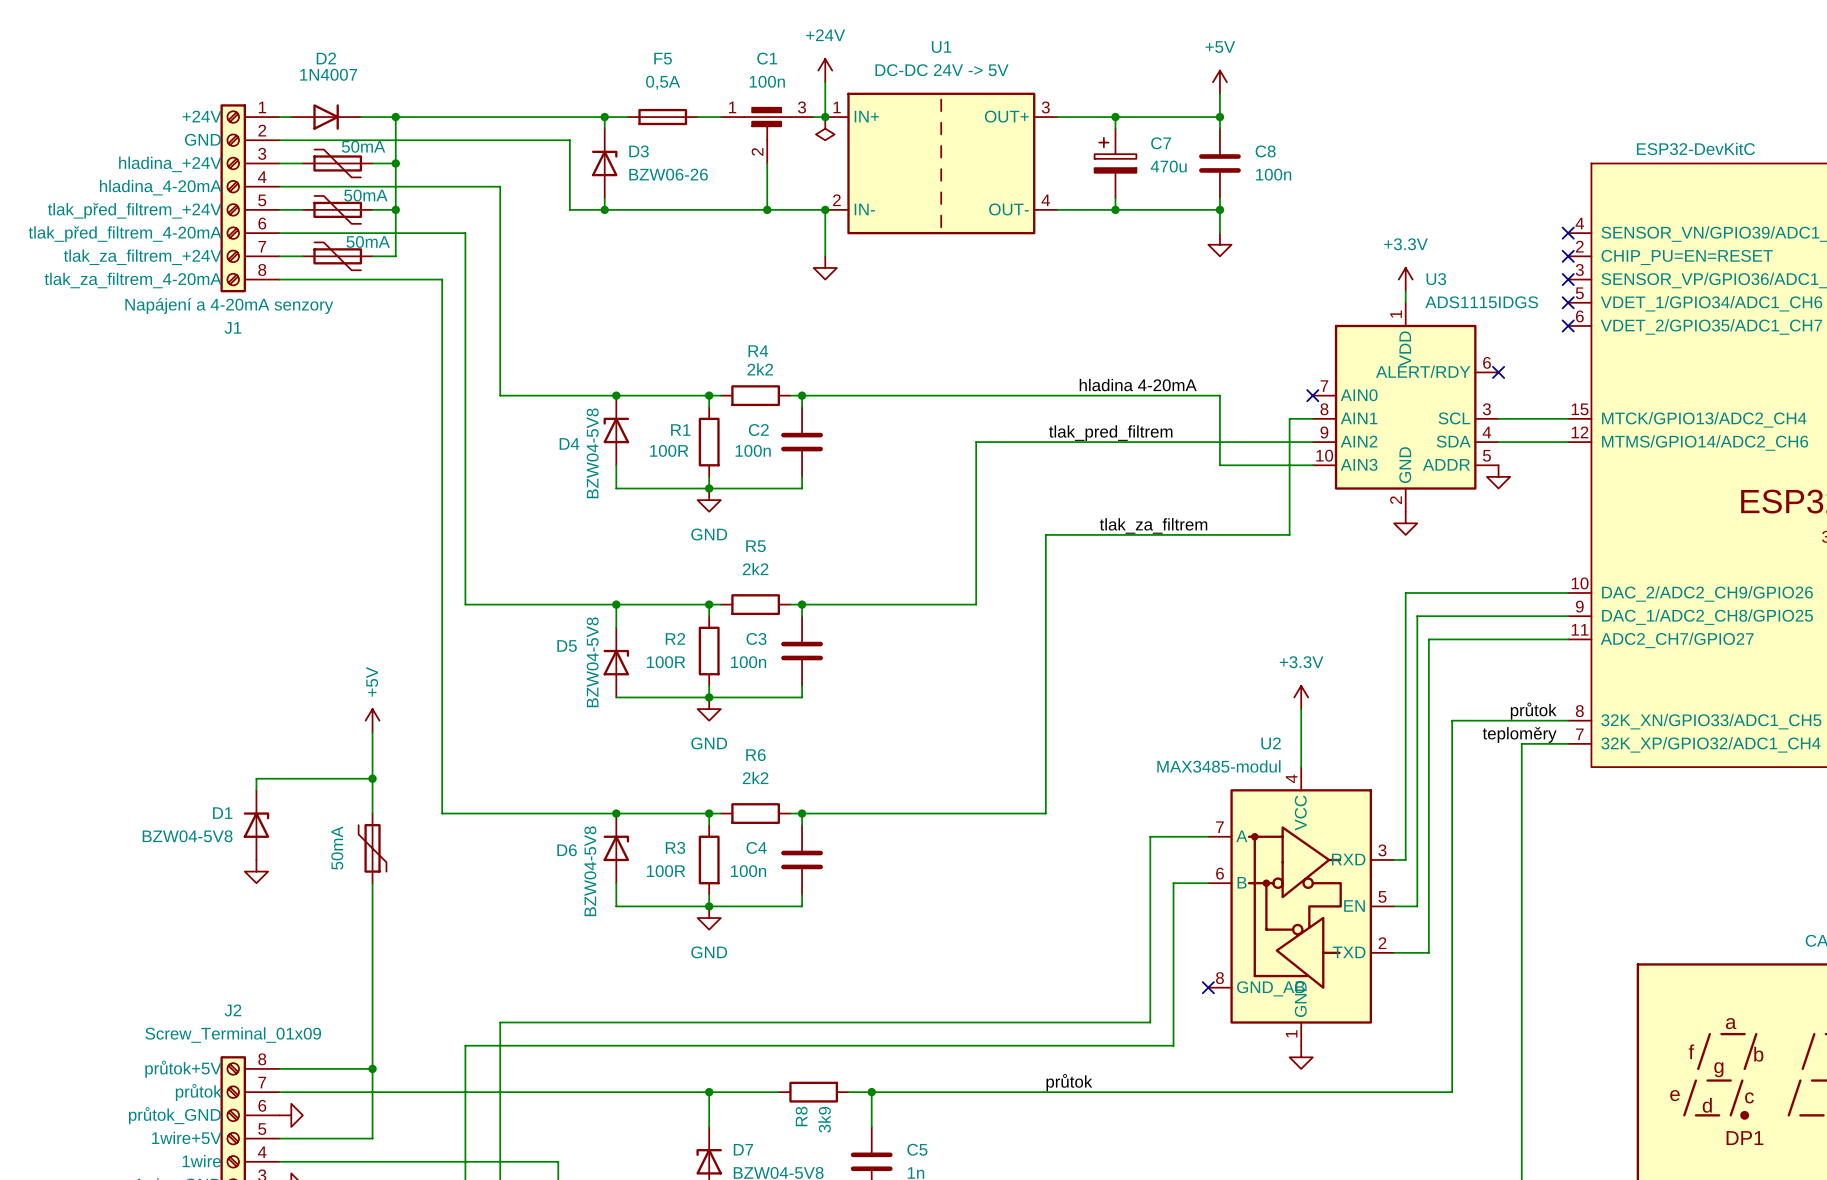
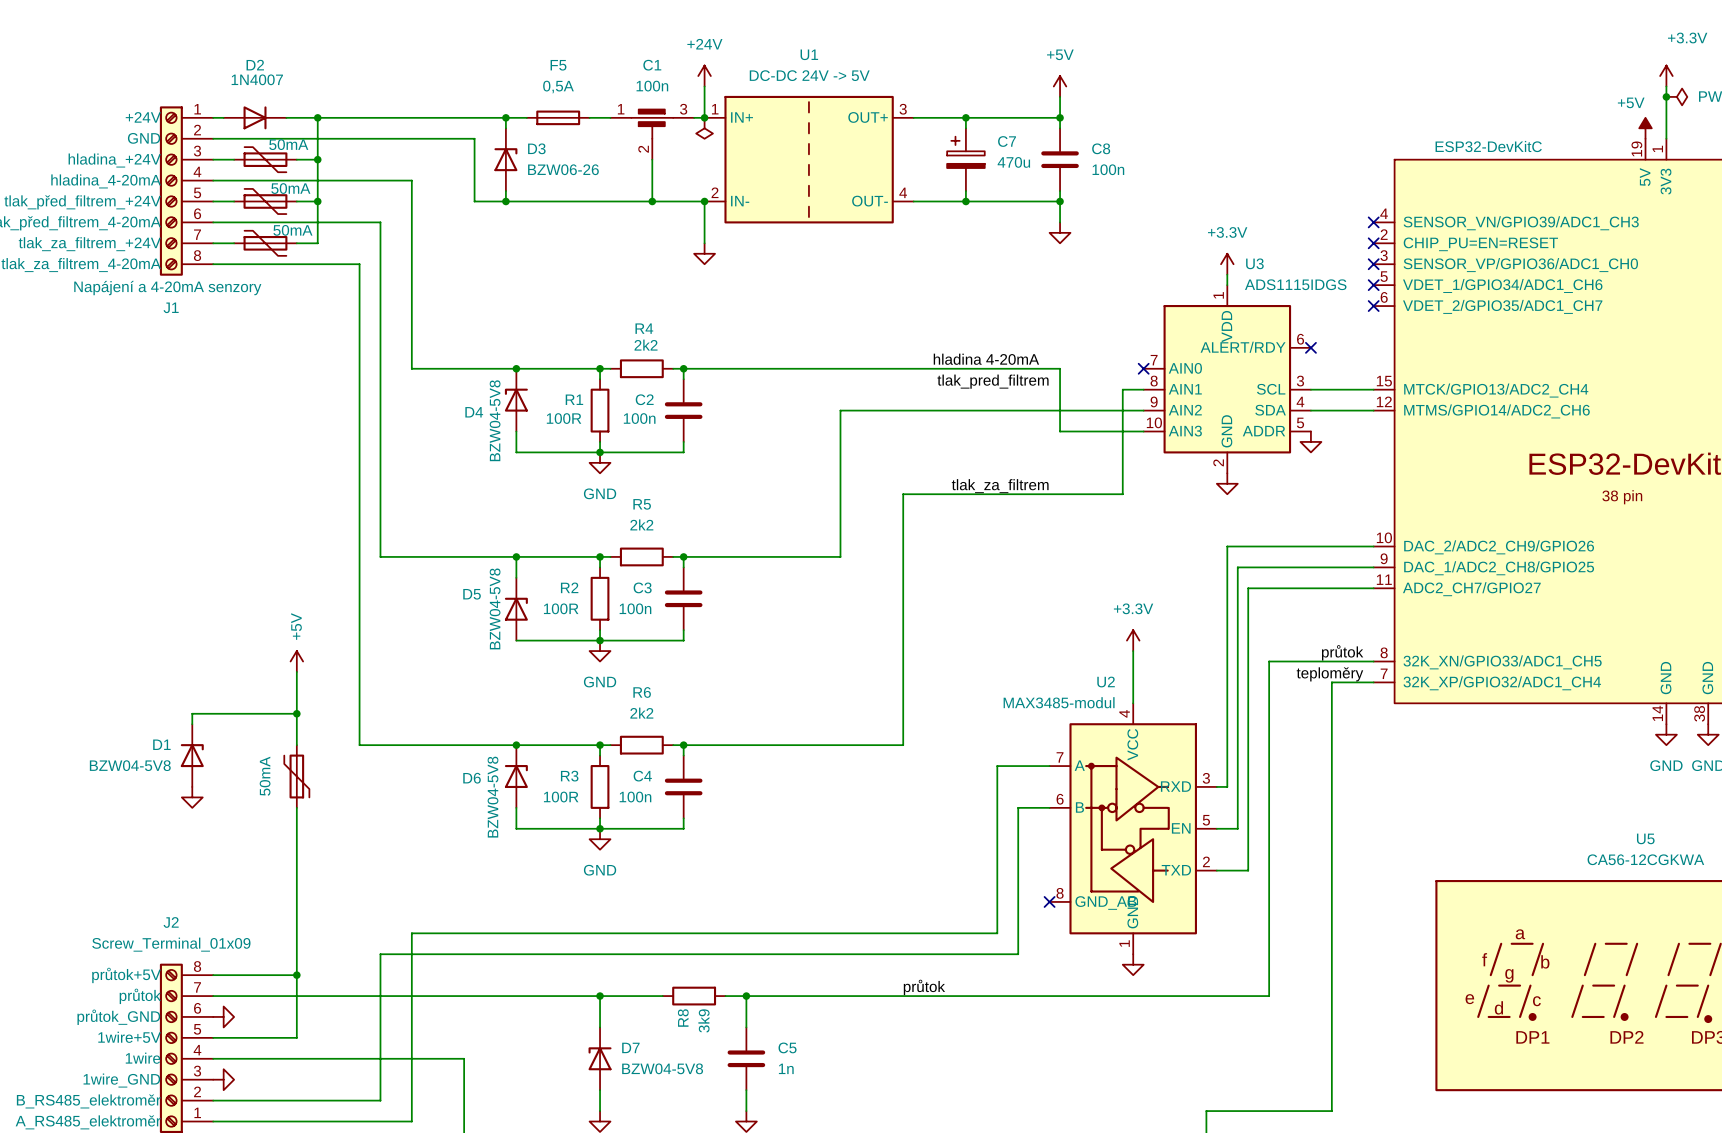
label position: tlak_pred_filtrem (1110, 433) -> tlak_pred_filtrem (993, 381)

